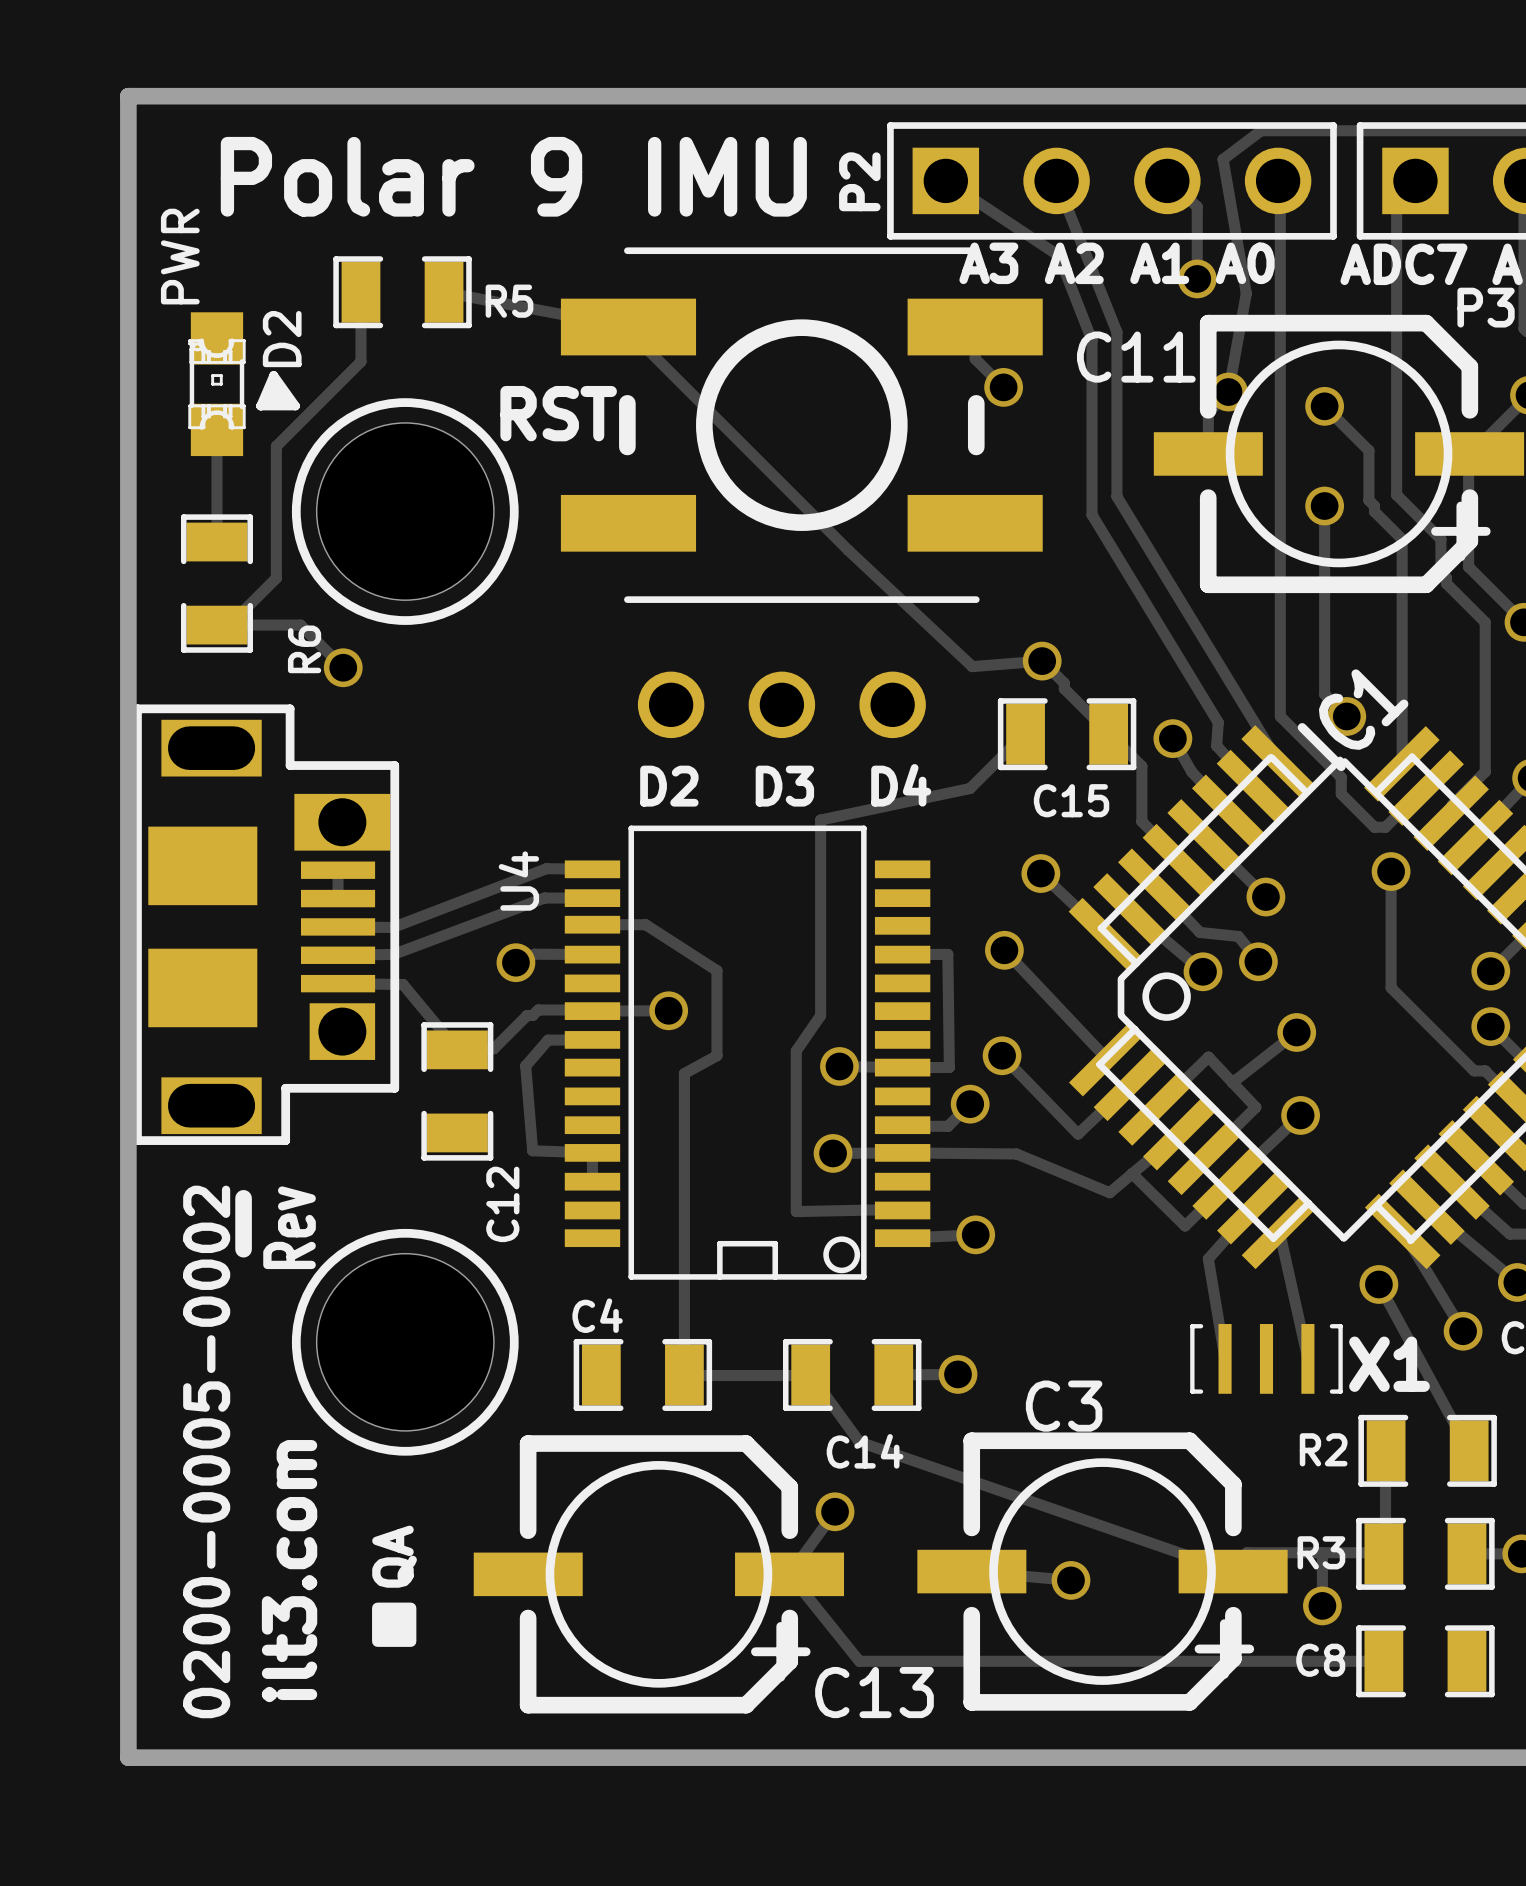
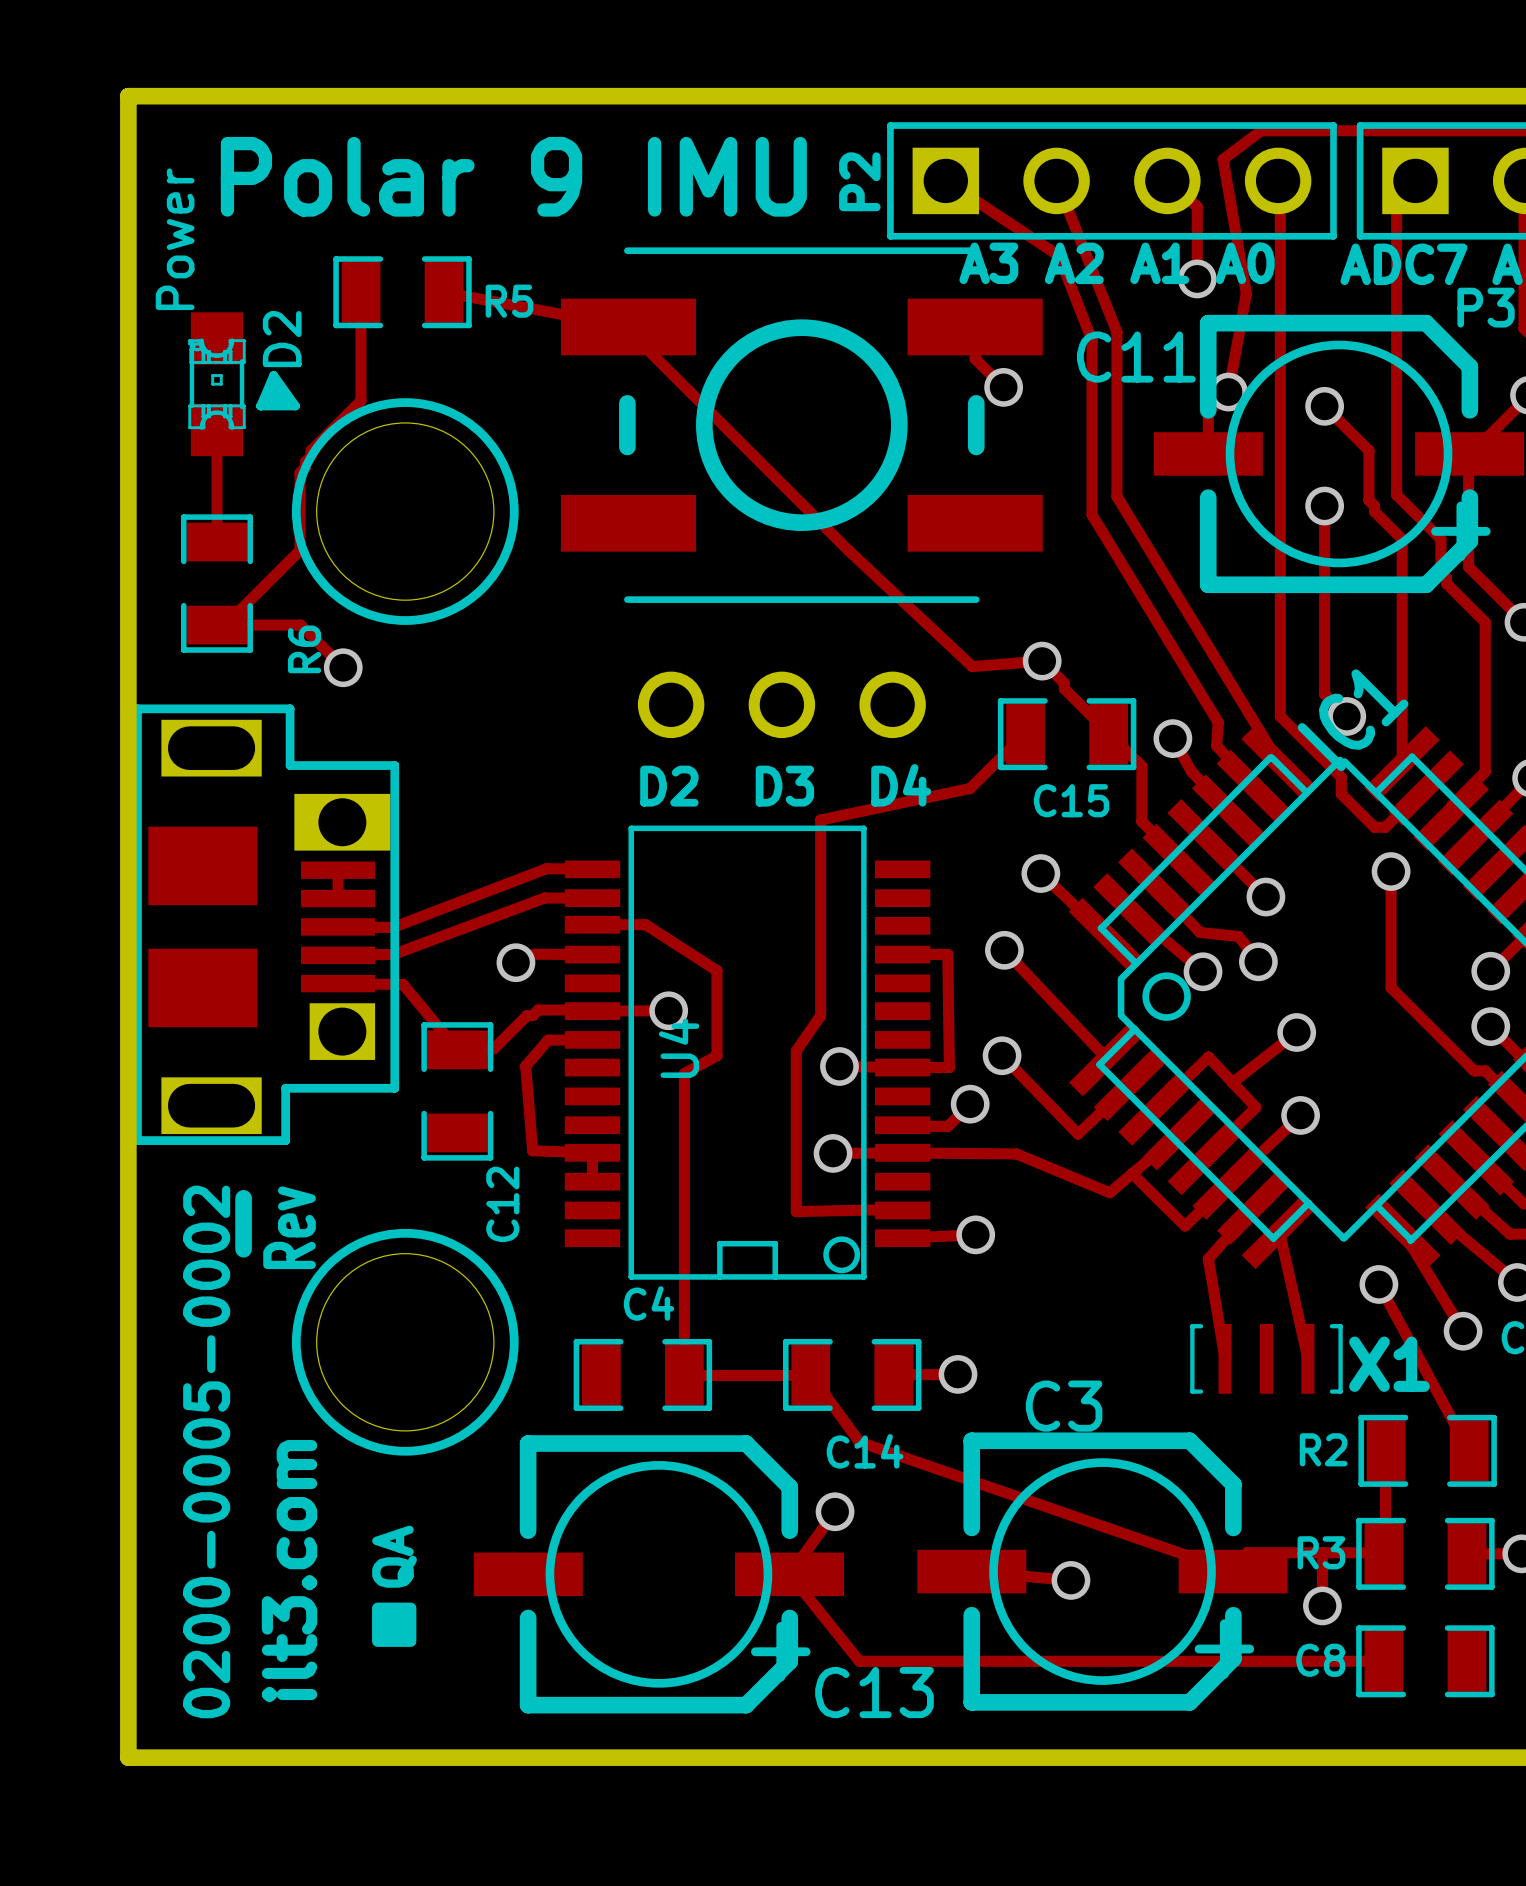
text: PWR (180, 256) -> Power (175, 239)
track: (360, 361) (276, 446) (276, 578) (229, 625) -> (360, 361) (360, 400) (311, 450) (311, 456) (305, 461) (305, 467) (300, 472) (300, 550) (222, 627) (216, 627) (216, 625)
text: RST (558, 413) -> none
U4 name position: U4 (518, 881) -> U4 (679, 1048)
C4 name position: C4 (597, 1315) -> C4 (648, 1303)

